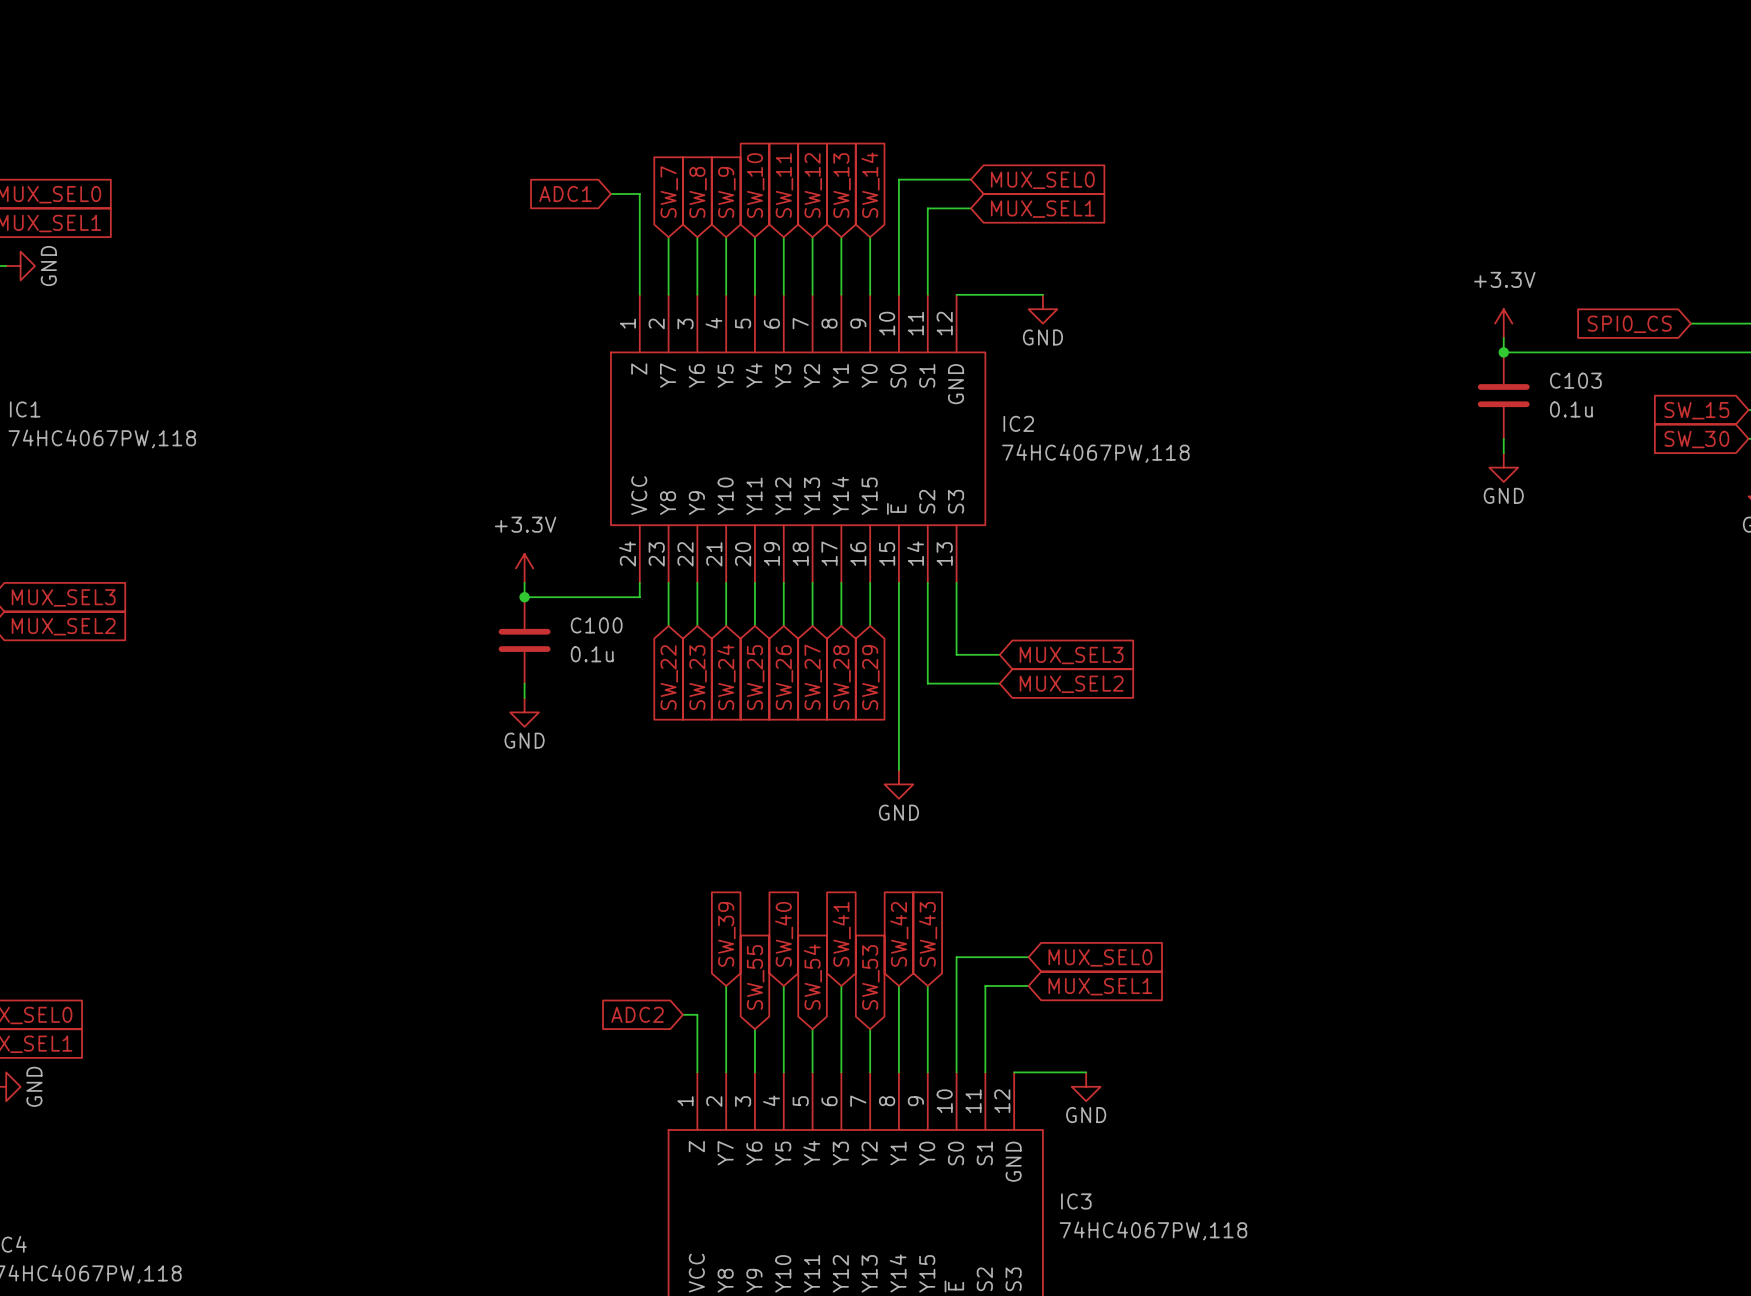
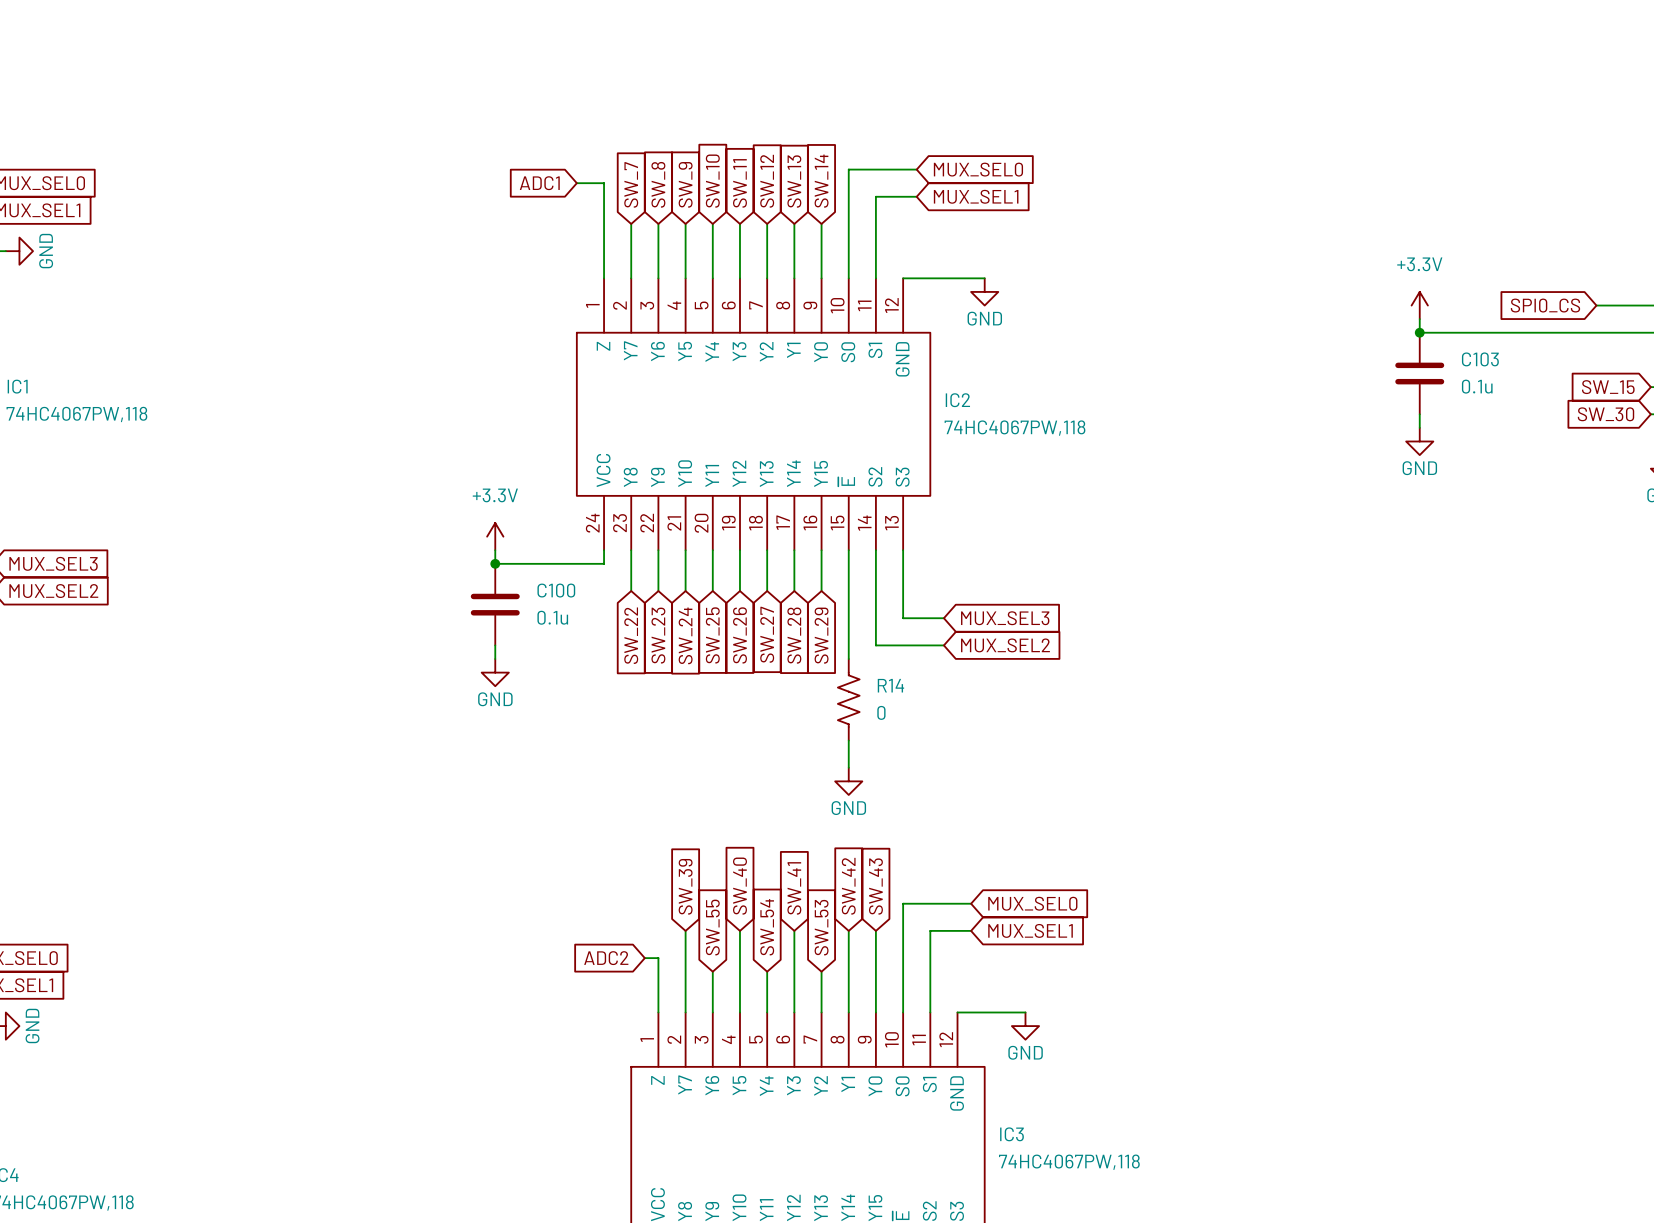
wire: (898, 698) (898, 770) -> none
R14: none -> 0 (848, 699)
wire: none -> (848, 740) (848, 767)
power symbol position: GND (898, 784) -> GND (848, 781)

